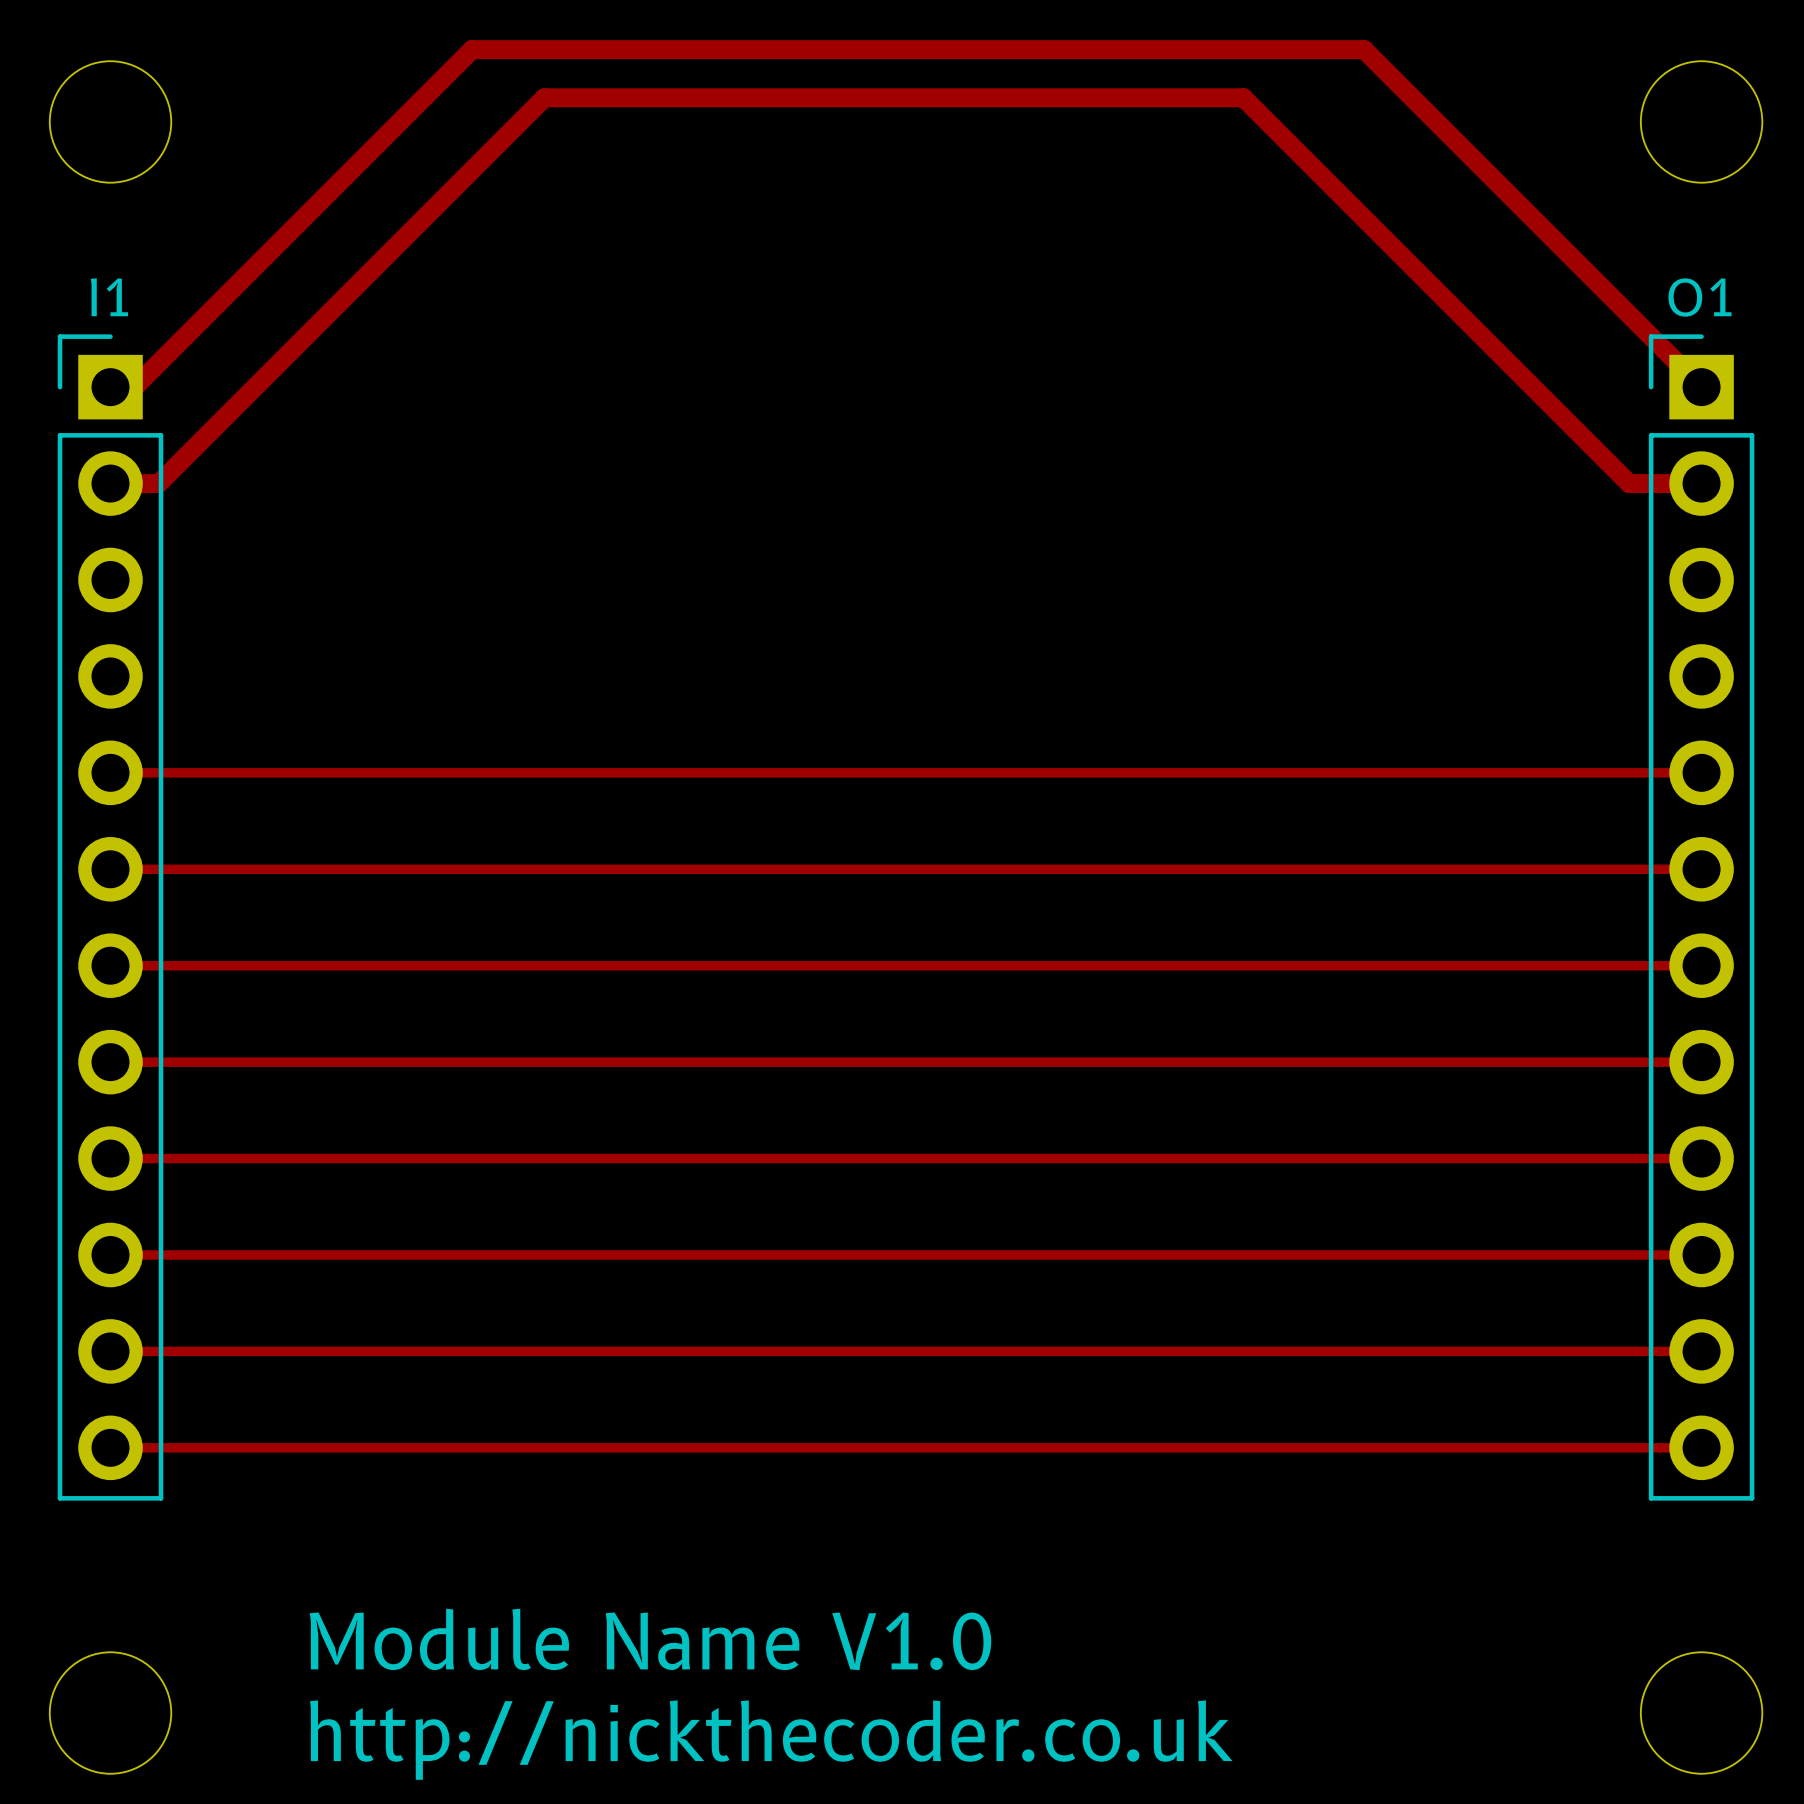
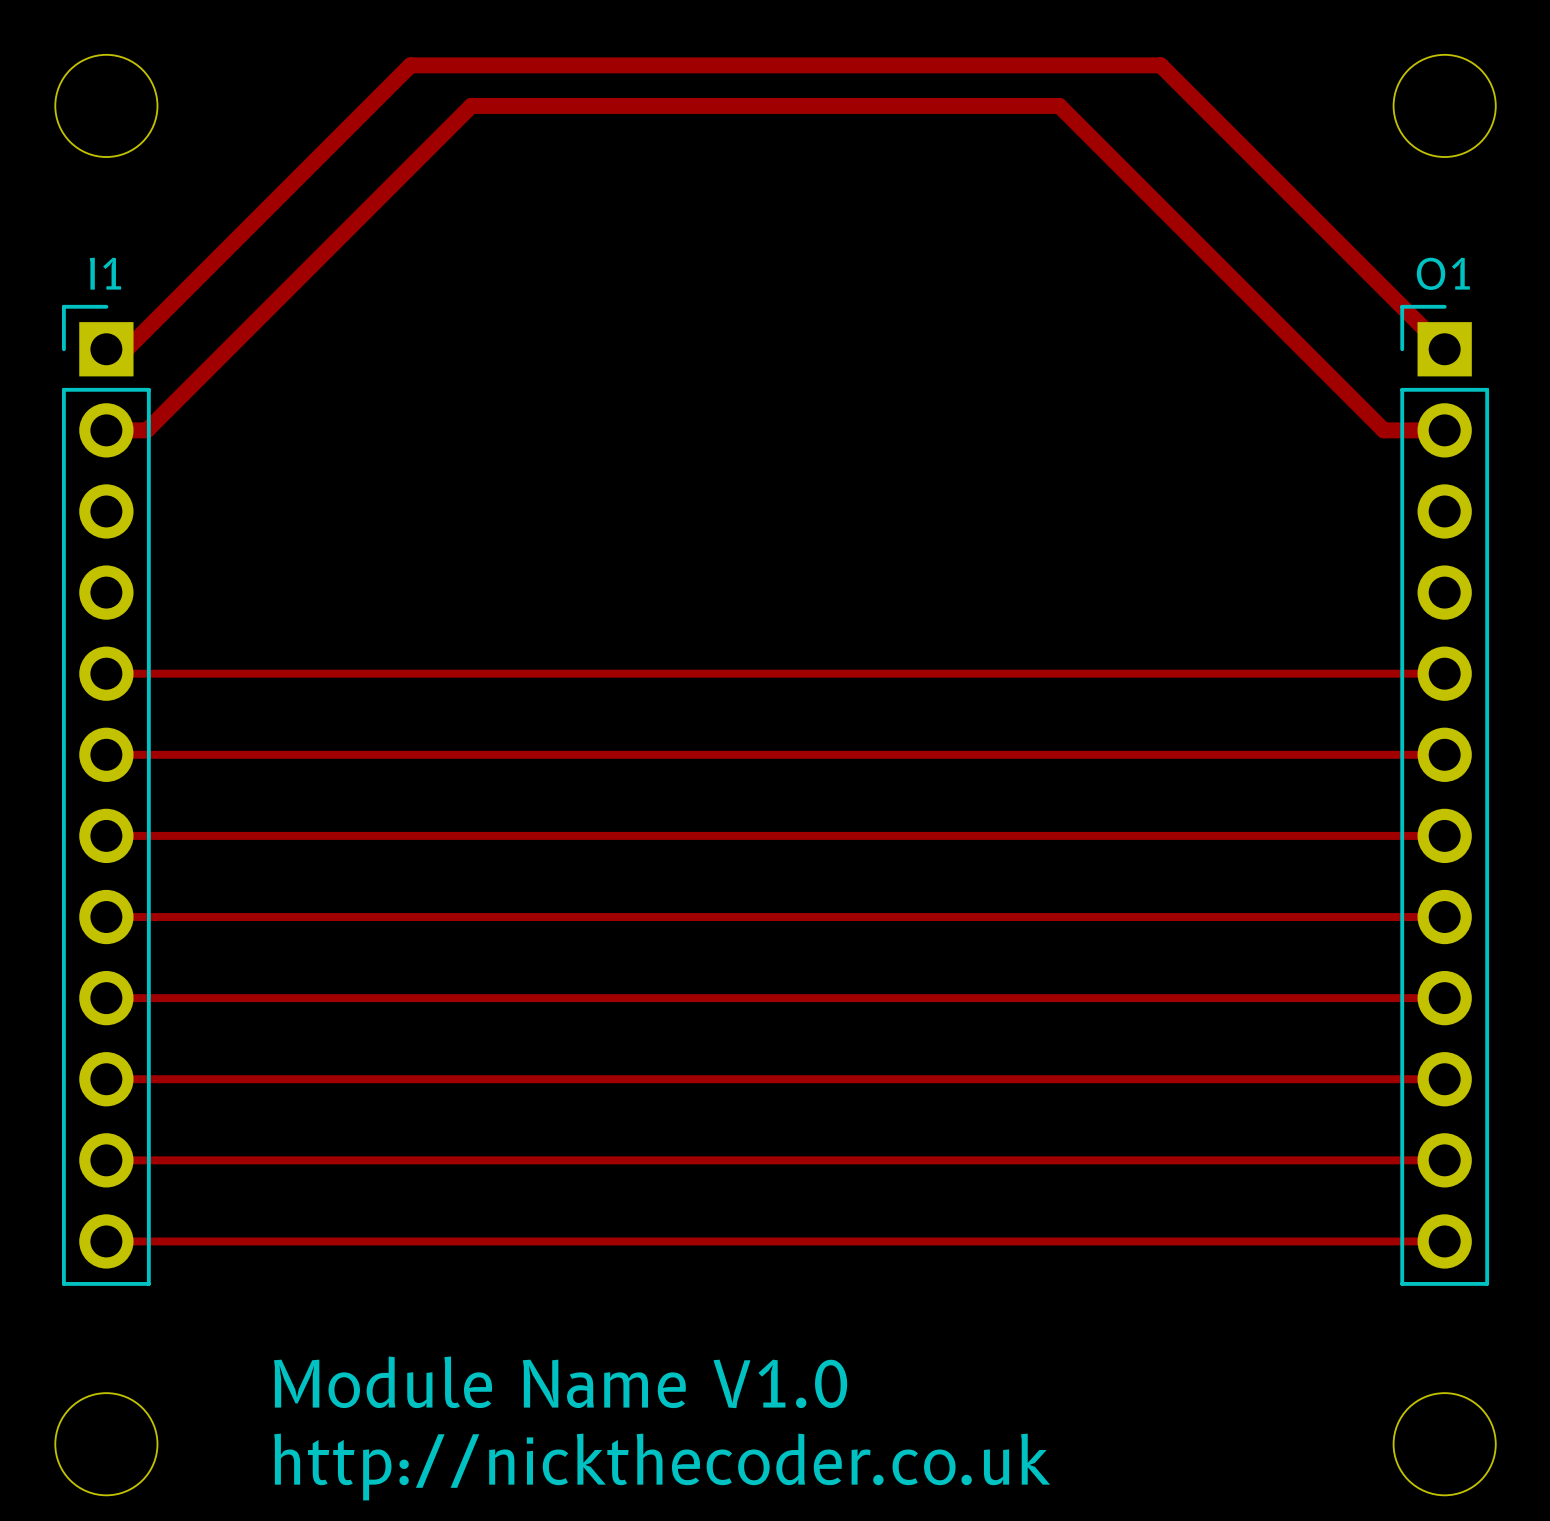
track: (110, 387) (134, 387) (472, 49) (1364, 49) (1701, 387) -> (106, 349) (126, 349) (410, 65) (1160, 65) (1444, 349)
track: (110, 483) (158, 483) (544, 97) (1243, 97) (1629, 483) (1701, 483) -> (106, 430) (146, 430) (471, 105) (1059, 105) (1383, 430) (1444, 430)
track: (110, 772) (1701, 772) -> (106, 673) (1444, 673)
track: (110, 869) (1701, 869) -> (106, 754) (1444, 754)
I1 position: (110, 917) -> (106, 795)
O1 position: (1701, 917) -> (1444, 795)
track: (110, 965) (1701, 965) -> (106, 835) (1444, 835)
track: (110, 1062) (1701, 1062) -> (106, 917) (1444, 917)
track: (110, 1158) (1701, 1158) -> (106, 998) (1444, 998)
track: (110, 1254) (1701, 1254) -> (106, 1079) (1444, 1079)
track: (110, 1351) (1701, 1351) -> (106, 1160) (1444, 1160)
track: (110, 1447) (1701, 1447) -> (106, 1241) (1444, 1241)

